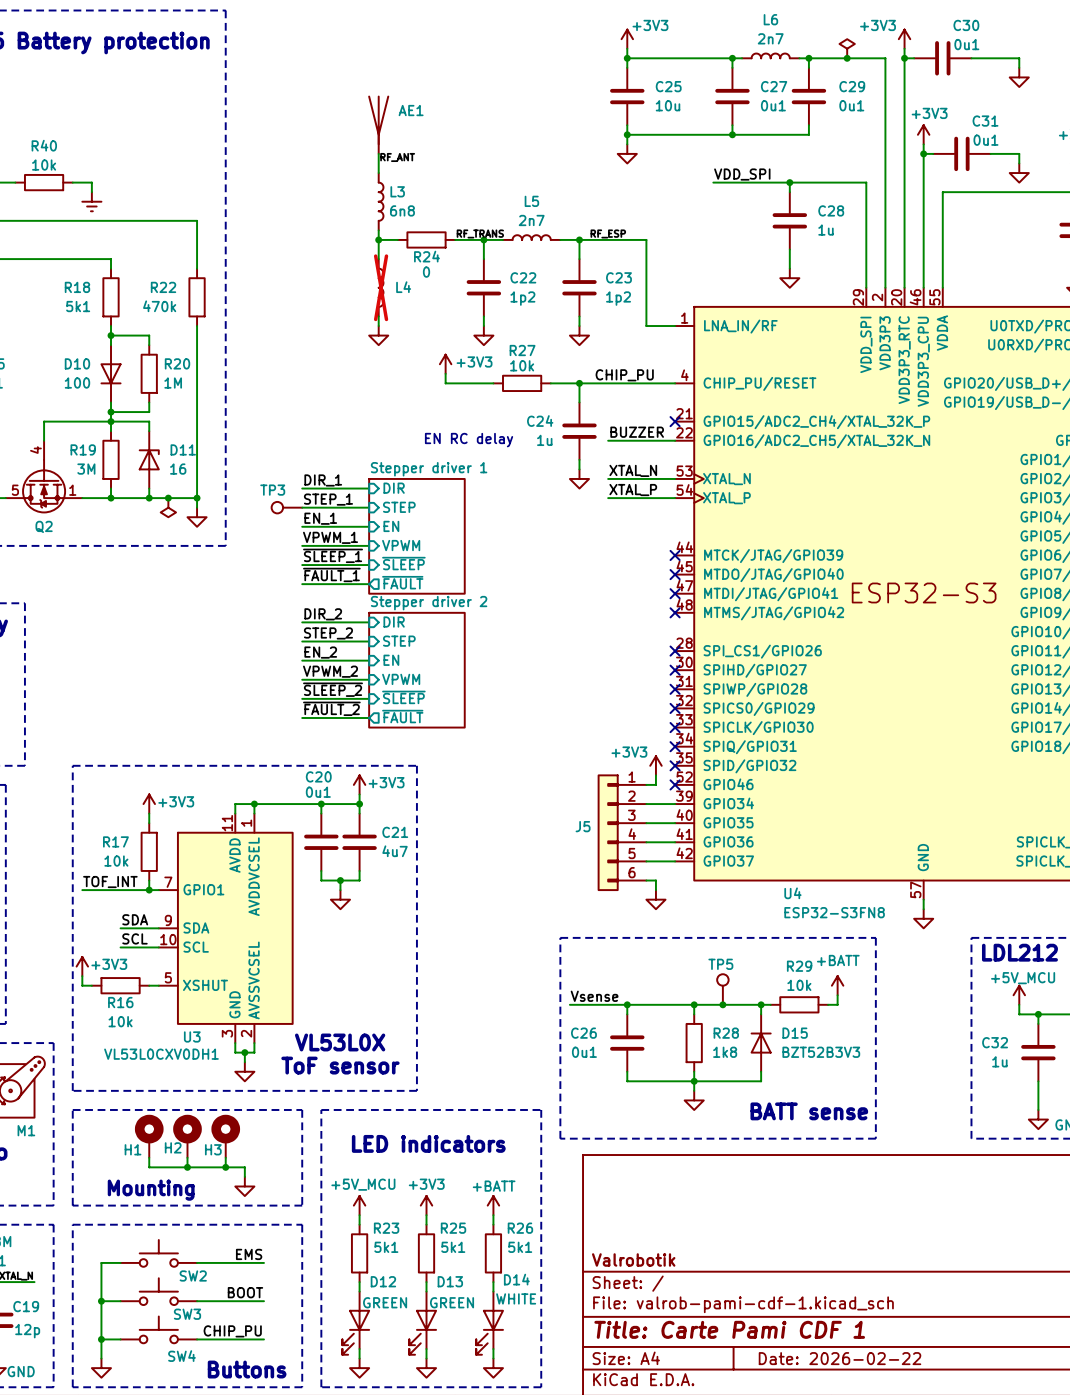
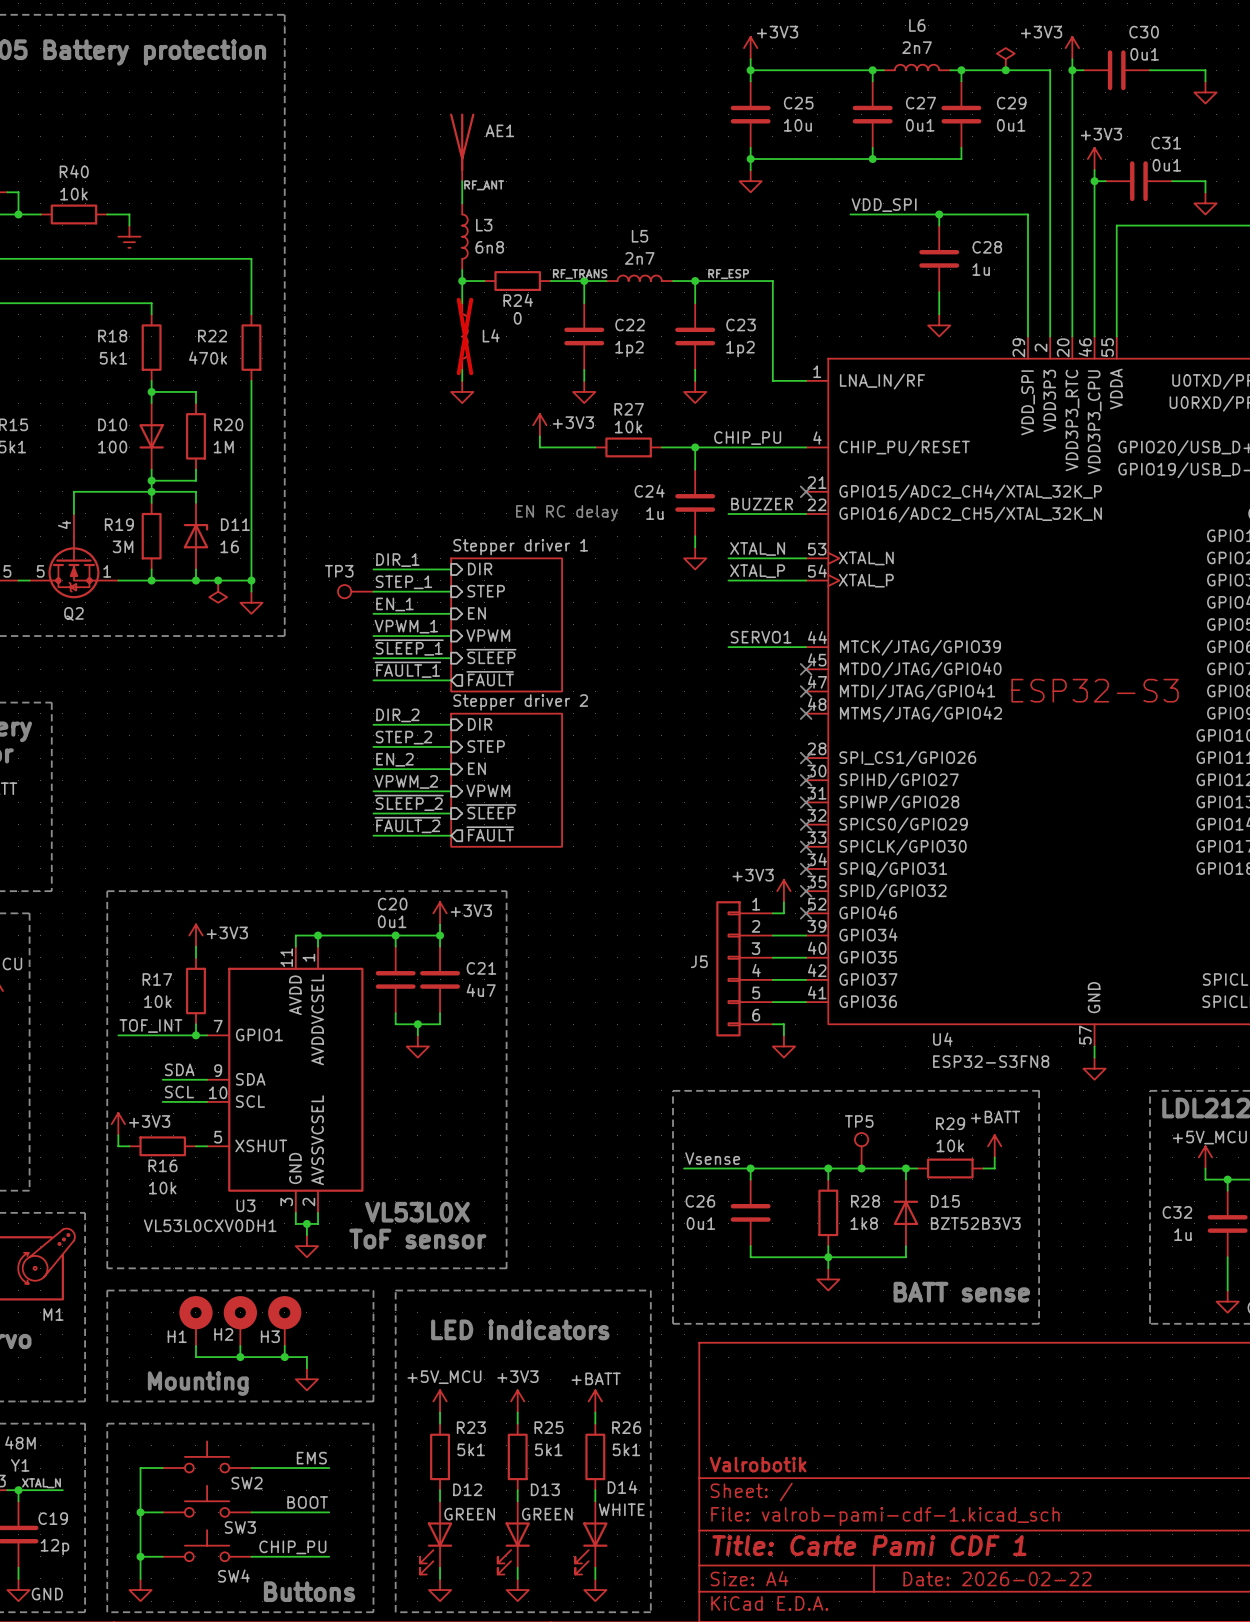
label: none -> SERVO1 (761, 637)
wire: none -> (728, 647) (806, 647)
no-connect mark: (675, 555) -> none
U4 pin number: 41 (684, 834) -> 42 (817, 970)
U4 pin name: GPIO36 (728, 841) -> GPIO37 (868, 979)
U4 pin number: 42 (684, 853) -> 41 (817, 992)
U4 pin name: GPIO37 (728, 861) -> GPIO36 (868, 1001)

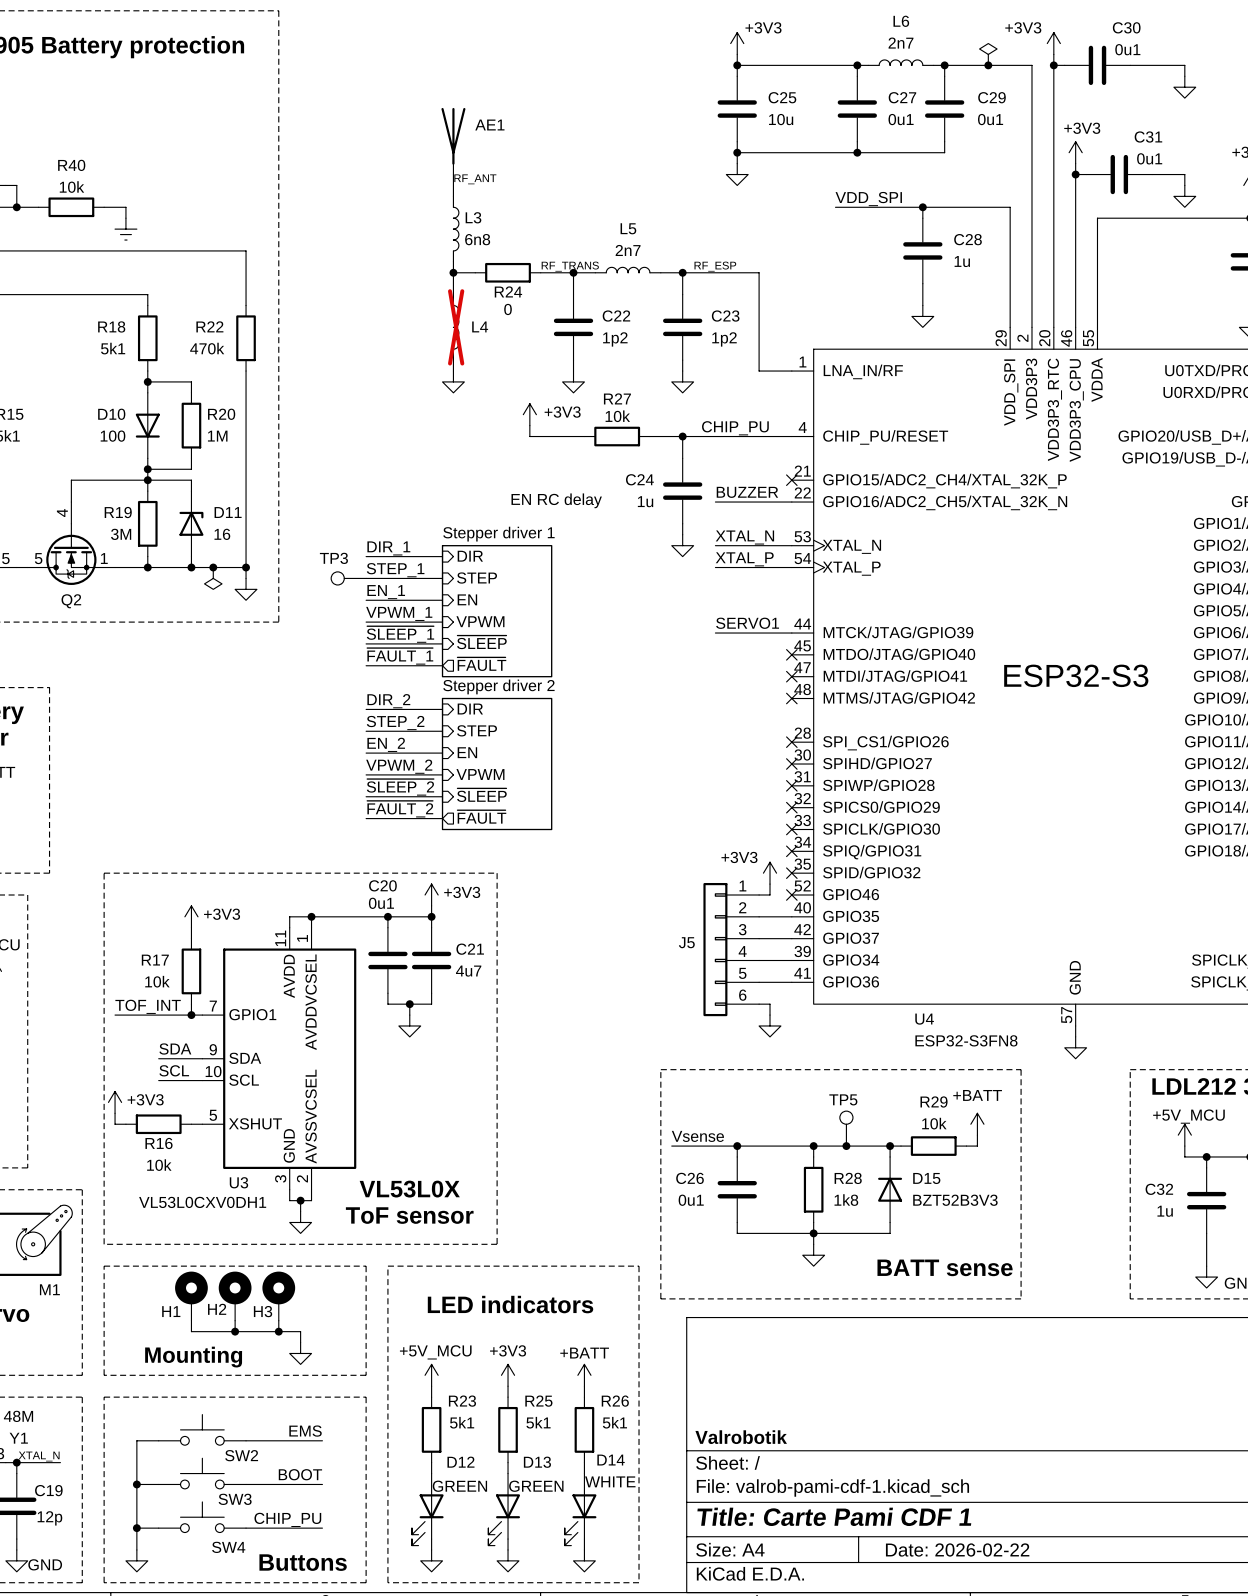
U4 pin number: 39 (816, 926) -> 40 (802, 907)
U4 pin name: GPIO34 (868, 934) -> GPIO35 (851, 916)
U4 pin number: 40 (817, 948) -> 42 (802, 929)
U4 pin name: GPIO35 (868, 957) -> GPIO37 (851, 938)
U4 pin number: 42 (817, 970) -> 39 (802, 951)
U4 pin name: GPIO37 (868, 979) -> GPIO34 (851, 960)

